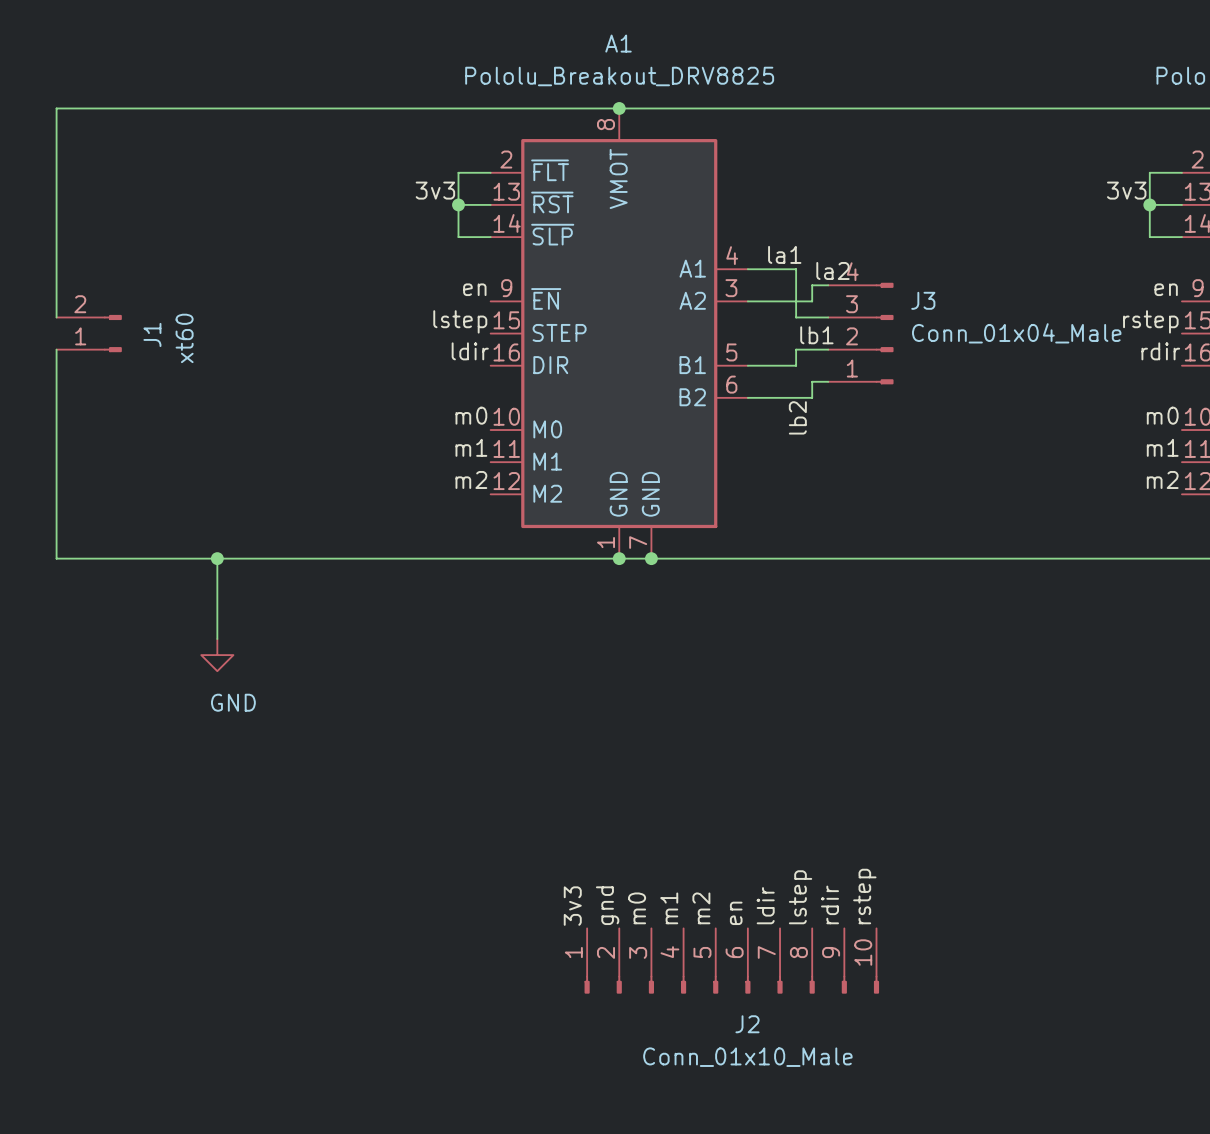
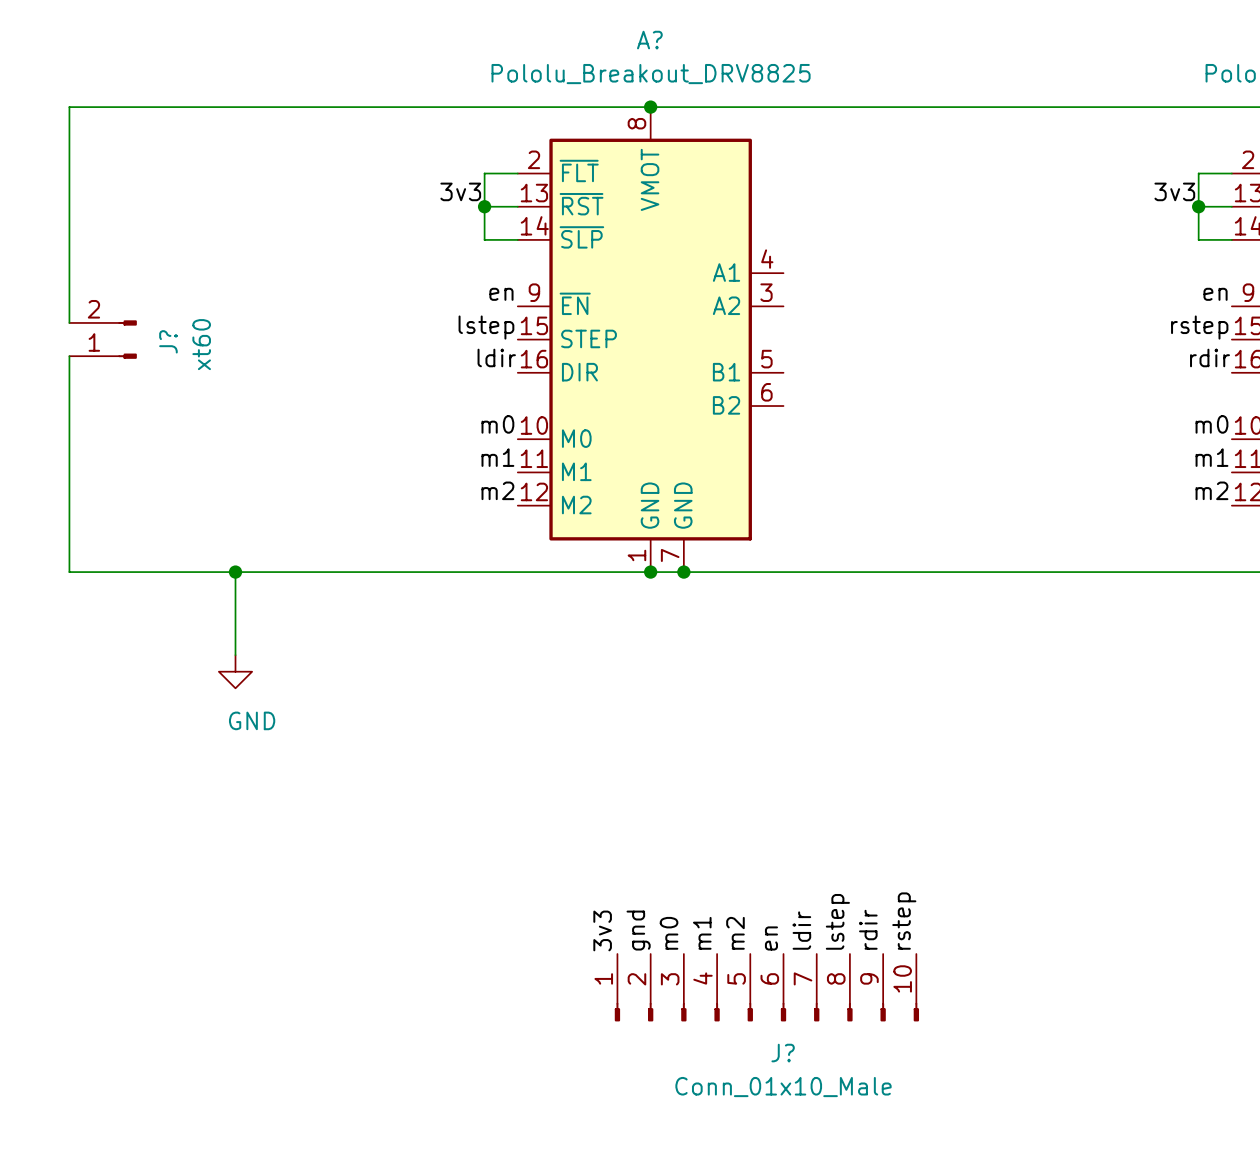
A1 name: A1 (618, 43) -> A? (649, 40)
label: la1 (784, 254) -> none
wire: (747, 269) (796, 269) (796, 317) (828, 317) -> none
label: la2 (832, 270) -> none
wire: (828, 285) (812, 285) (812, 301) (747, 301) -> none
J3: Conn_01x04_Male (860, 333) -> none
J1 name: J1 (152, 334) -> J? (168, 341)
label: lb1 (816, 335) -> none
wire: (828, 349) (796, 349) (796, 365) (747, 365) -> none
wire: (828, 381) (812, 381) (812, 397) (747, 397) -> none
label: lb2 (797, 417) -> none
J2 name: J2 (747, 1024) -> J? (783, 1053)

